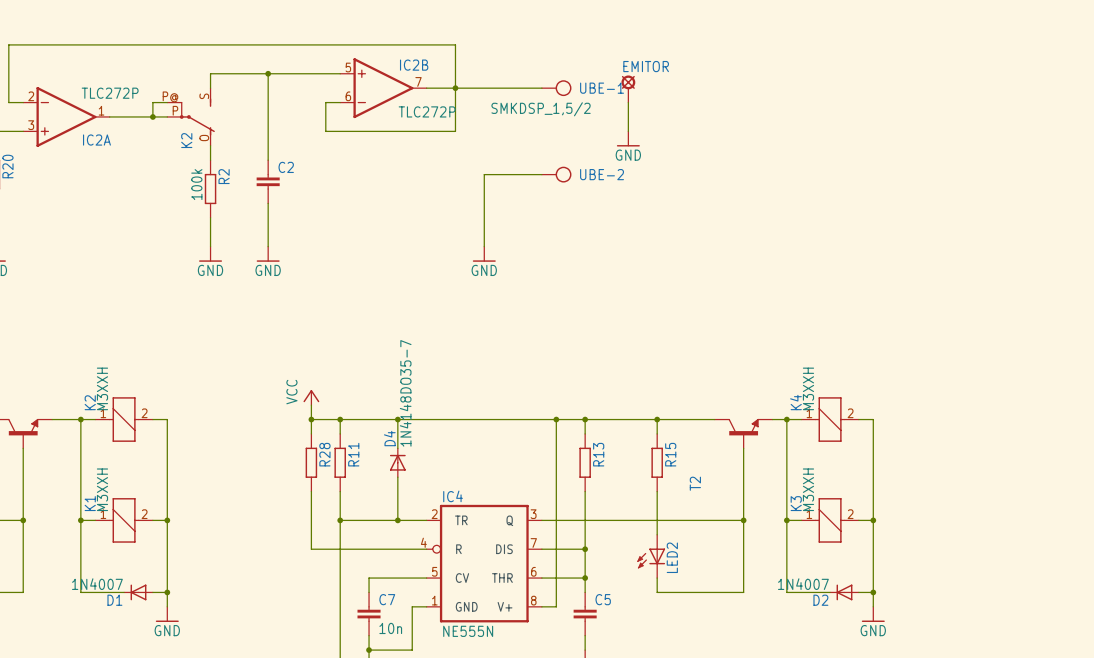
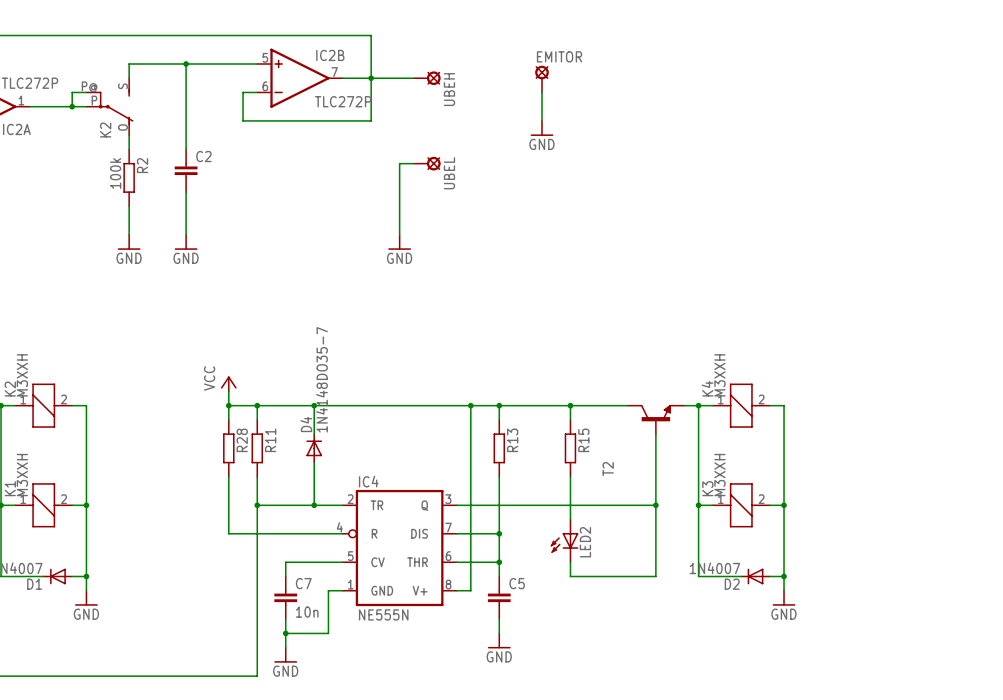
wire: (498, 88) (541, 88) -> none
UBEH: none -> (427, 78)
UBE-1: SMKDSP_1,5/2 (556, 88) -> none
wire: (498, 174) (541, 174) -> none
UBEL: none -> (427, 163)
UBE-2: (556, 174) -> none

